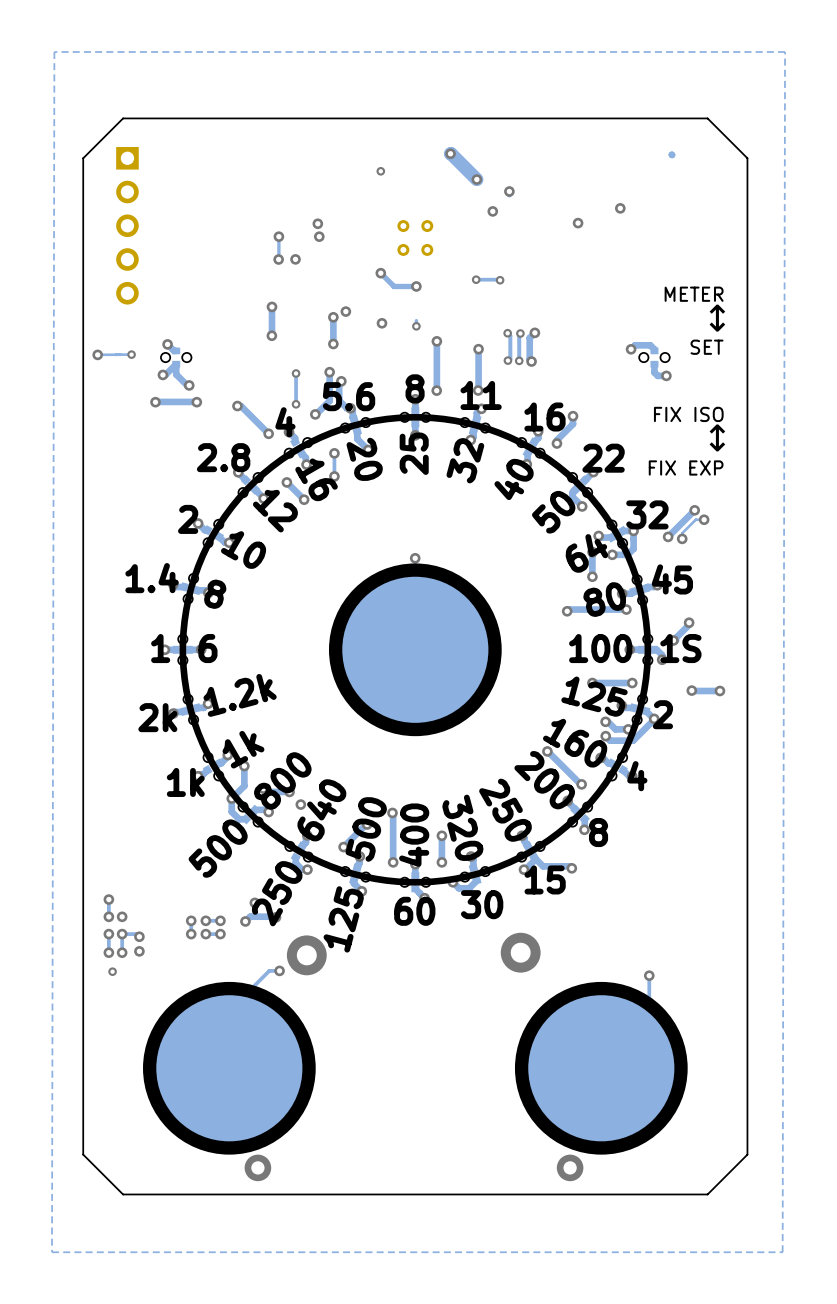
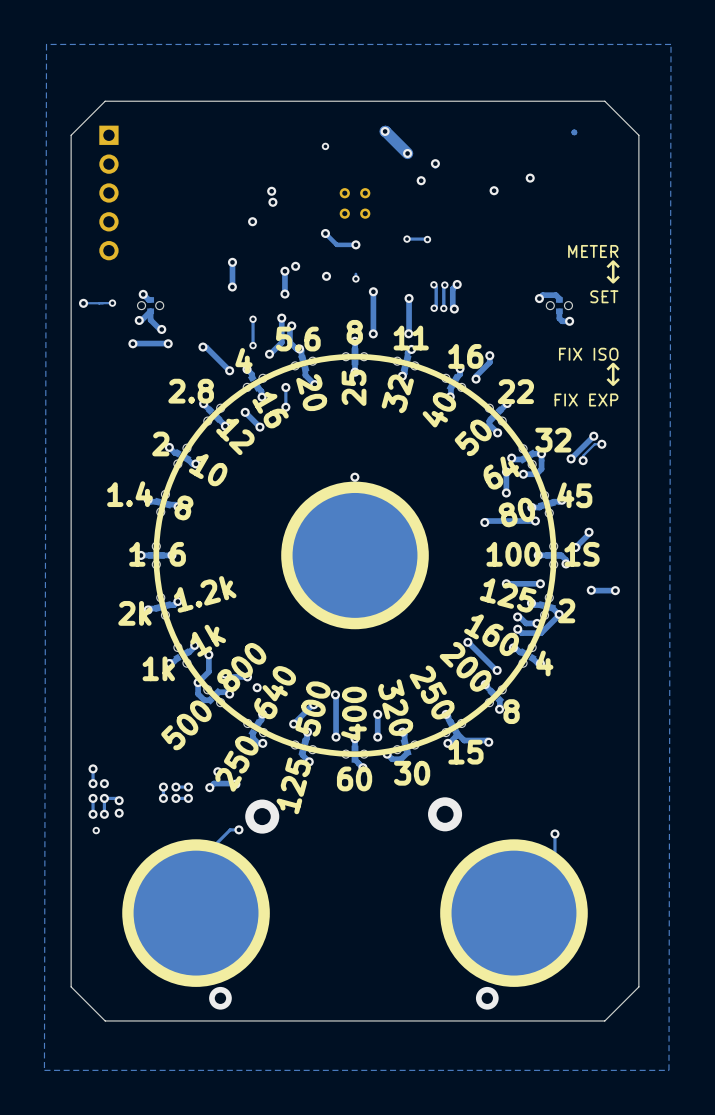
track: (278, 236) (278, 259) -> none
via: (278, 236) -> none
via: (278, 259) -> none

